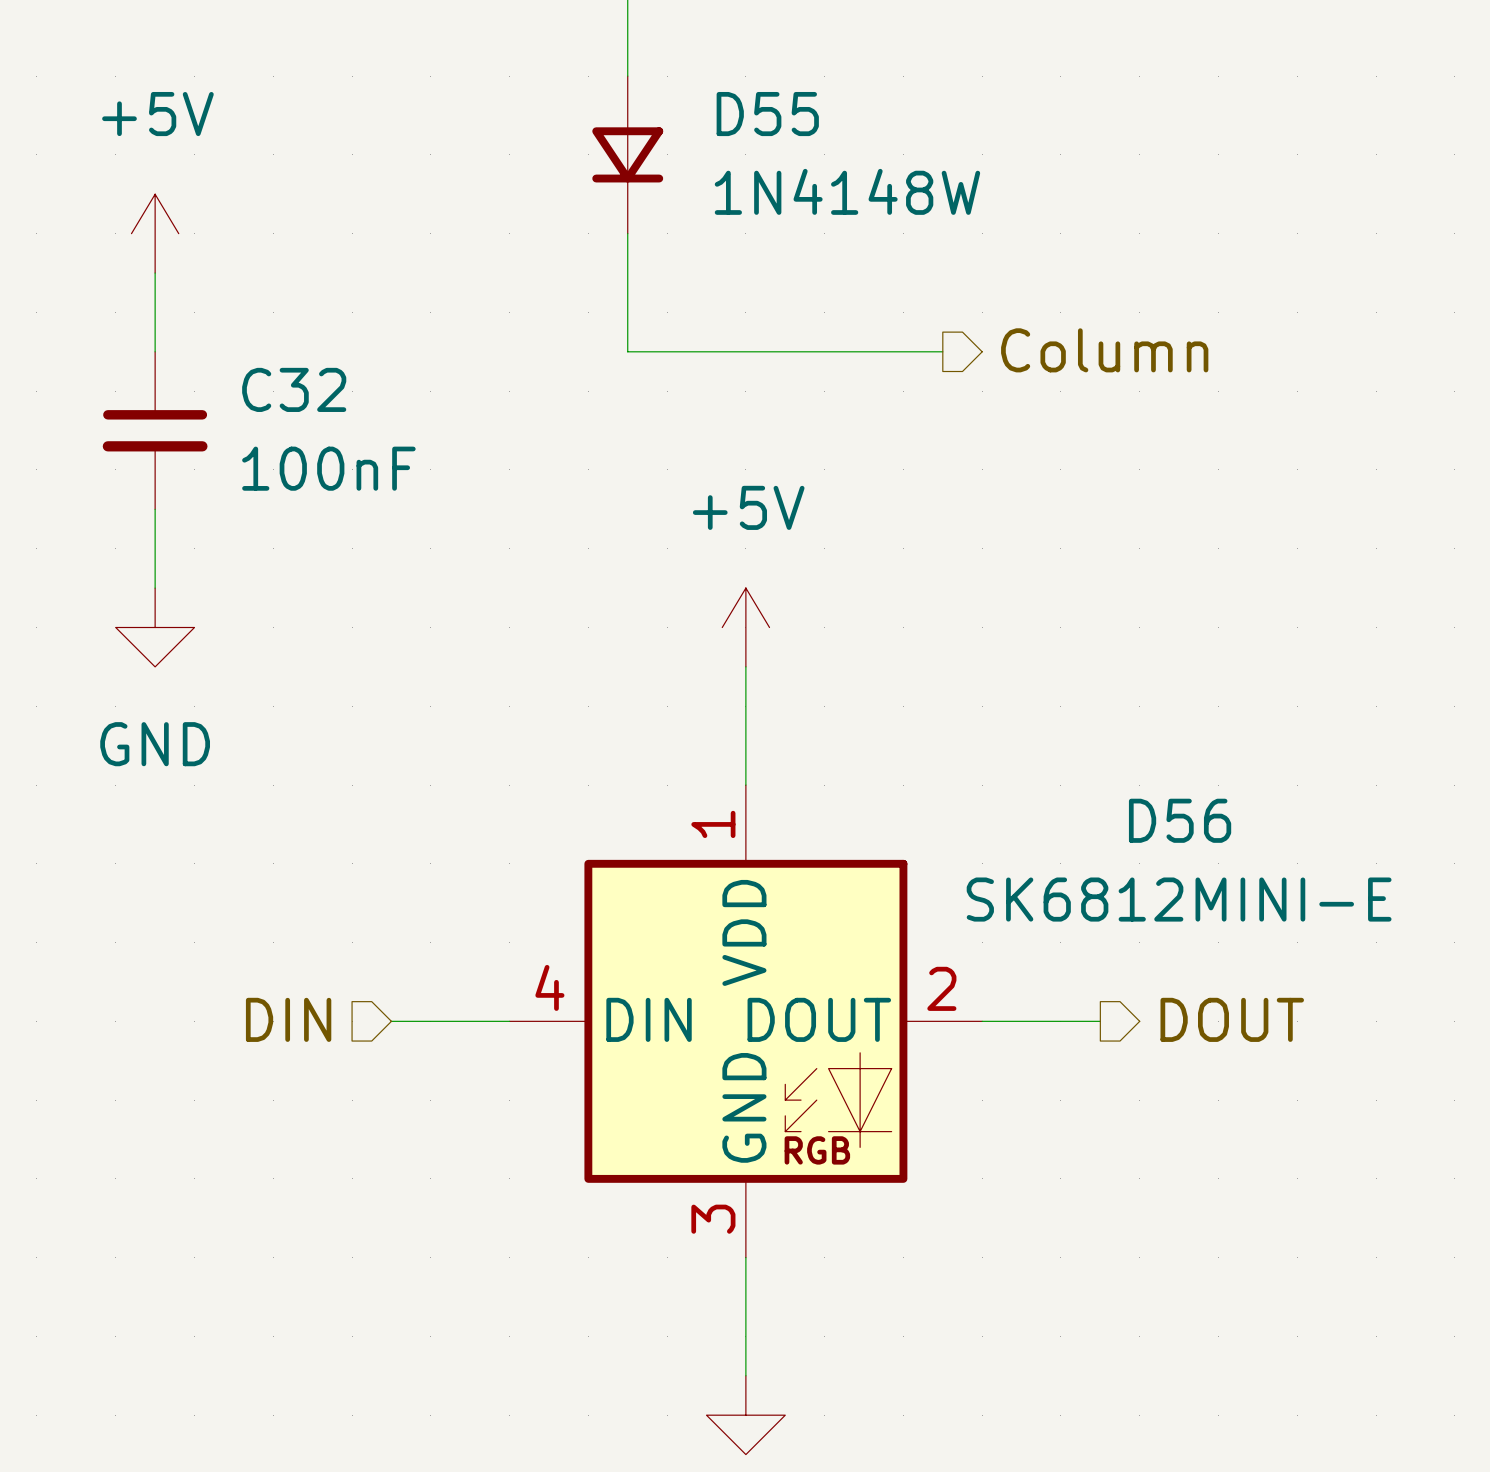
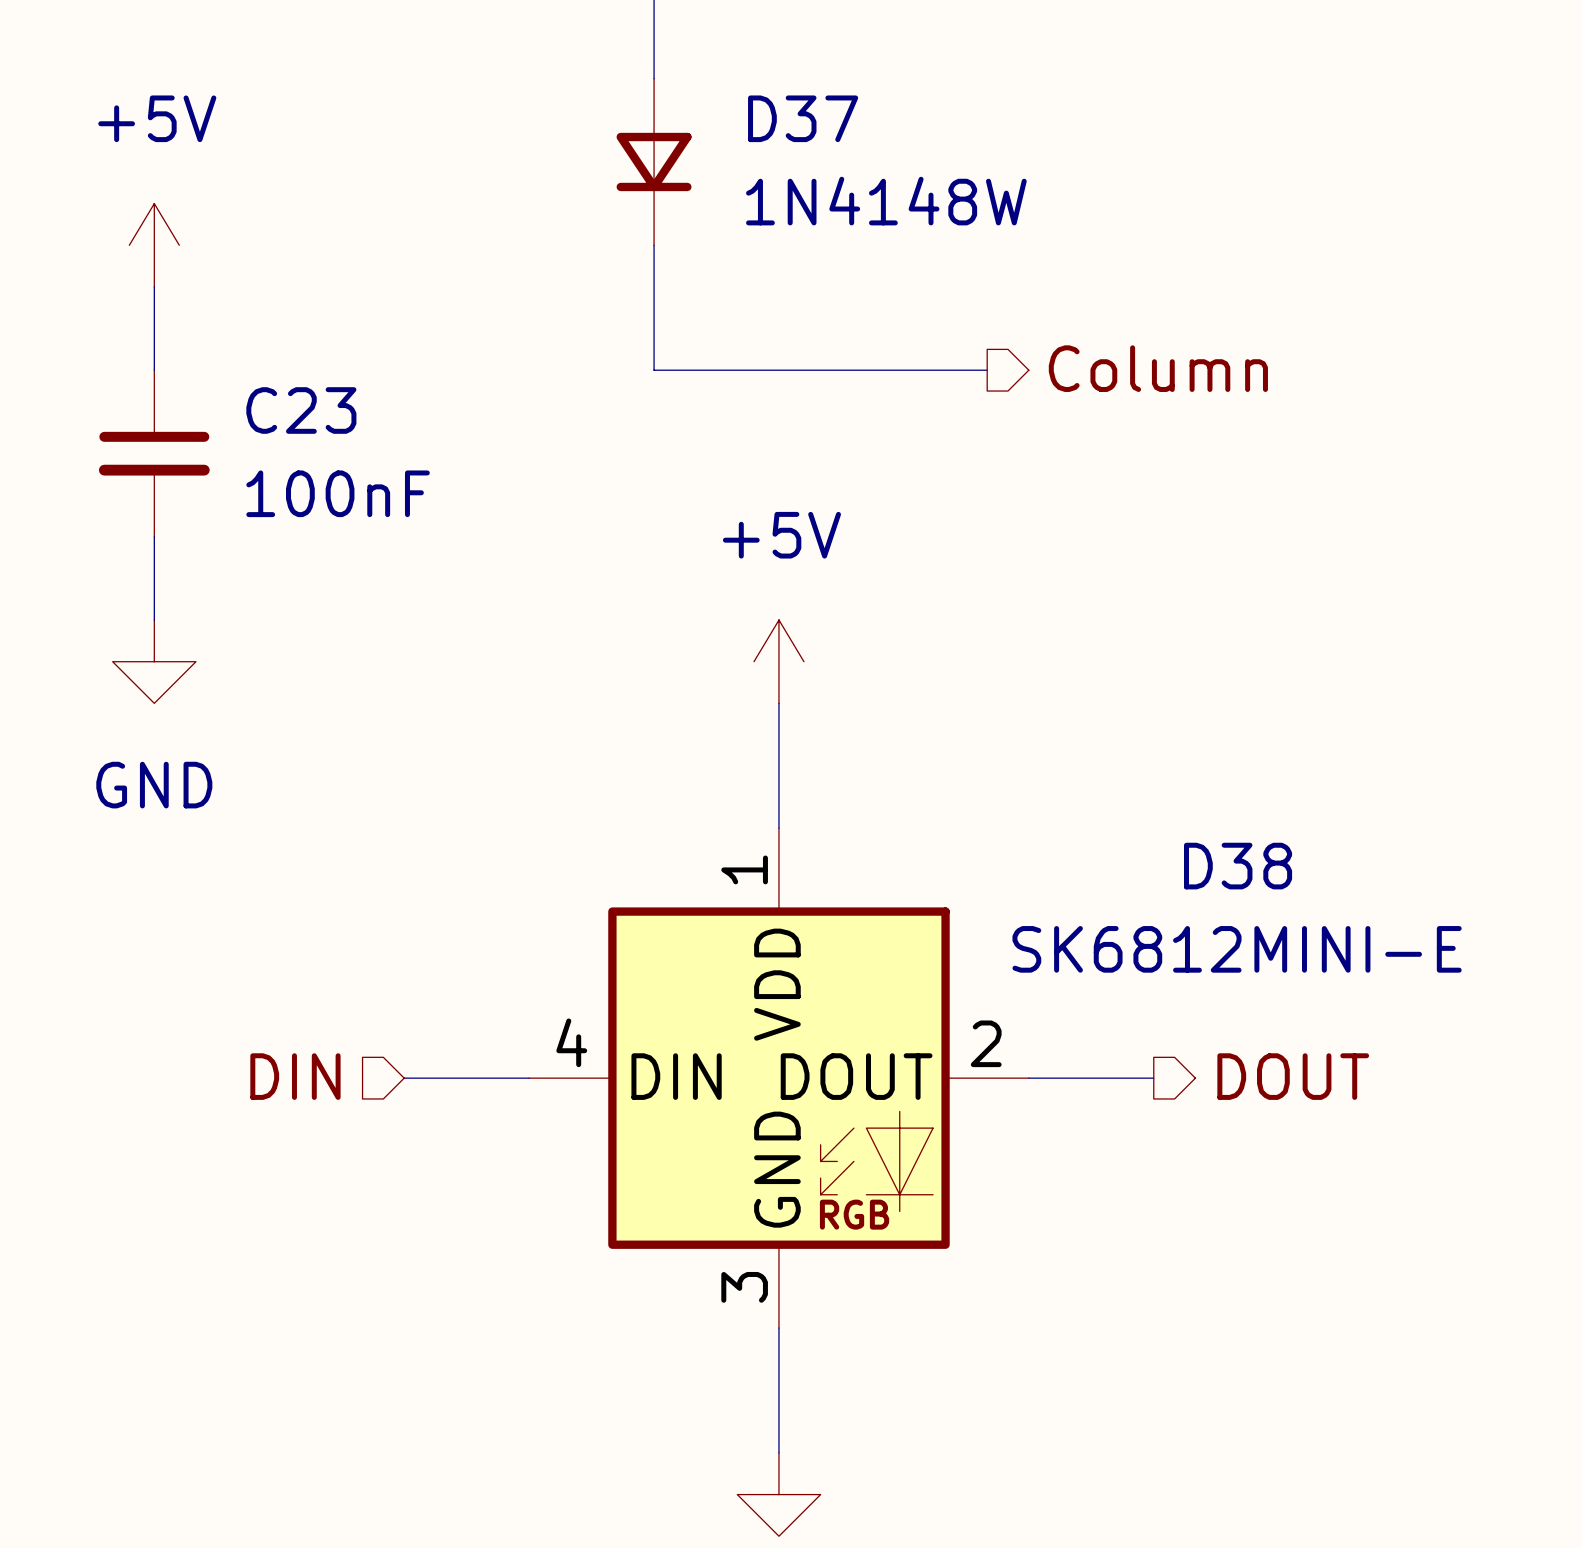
D55 name: D55 (767, 114) -> D37 (803, 118)
C32 name: C32 (294, 389) -> C23 (301, 410)
D56 name: D56 (1180, 820) -> D38 (1238, 866)

